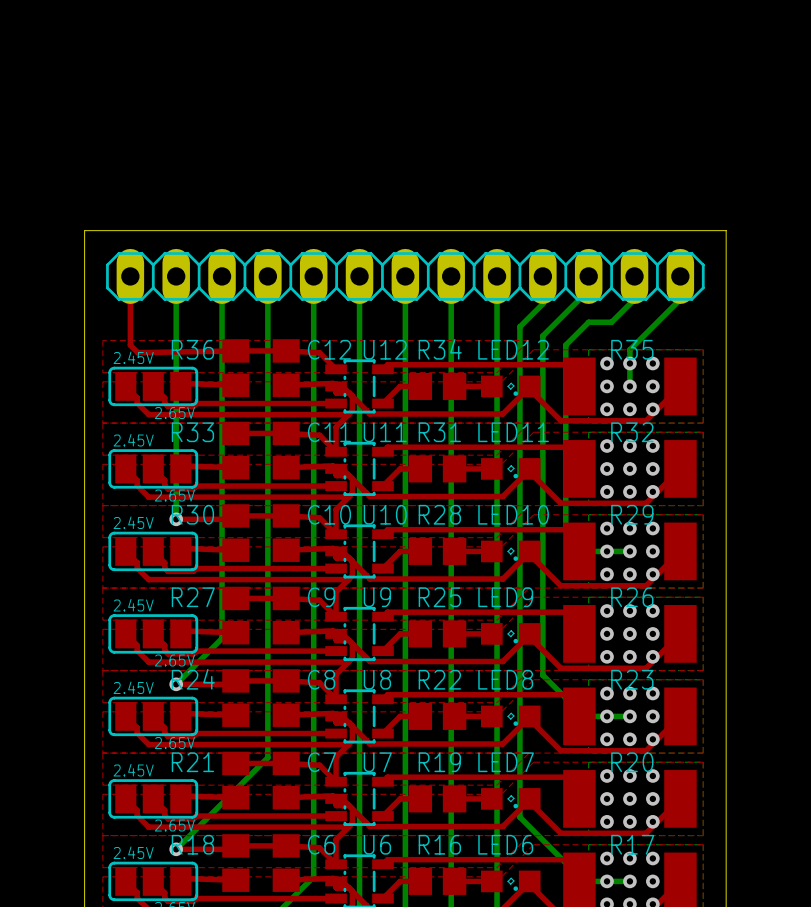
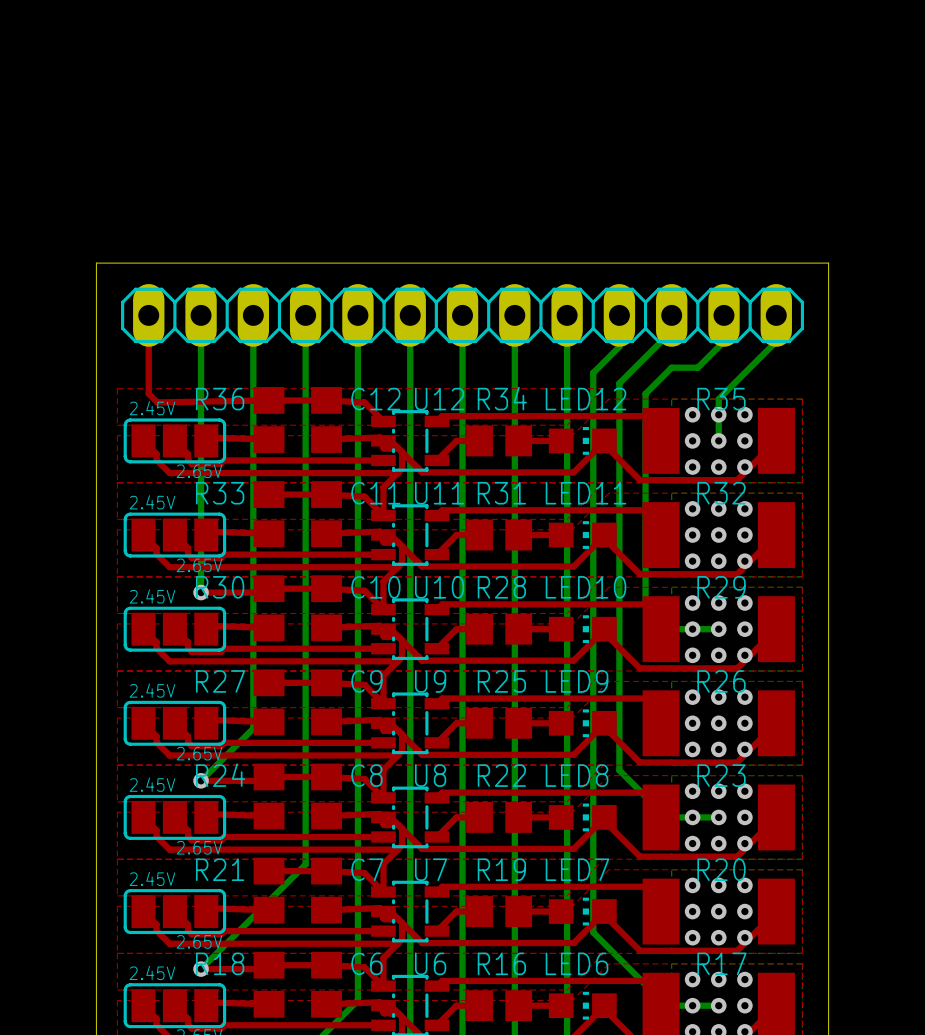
LED12 footprint: [481, 375, 541, 398] -> [548, 427, 617, 455]
LED11 footprint: [481, 458, 541, 480] -> [548, 521, 617, 549]
LED10 footprint: [481, 540, 541, 563] -> [548, 615, 617, 644]
LED9 footprint: [481, 623, 541, 645] -> [548, 709, 617, 738]
LED8 footprint: [481, 705, 541, 728] -> [548, 803, 617, 832]
LED7 footprint: [481, 788, 541, 810] -> [548, 897, 617, 926]
LED6 footprint: [481, 870, 541, 893] -> [548, 991, 617, 1020]

